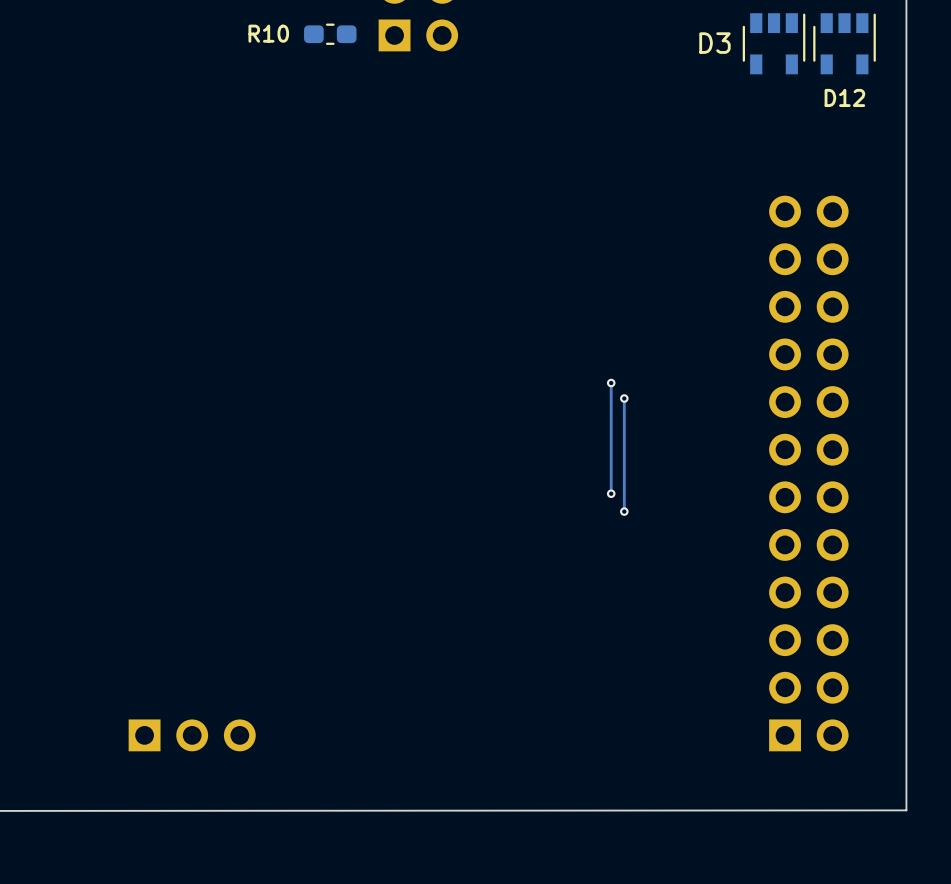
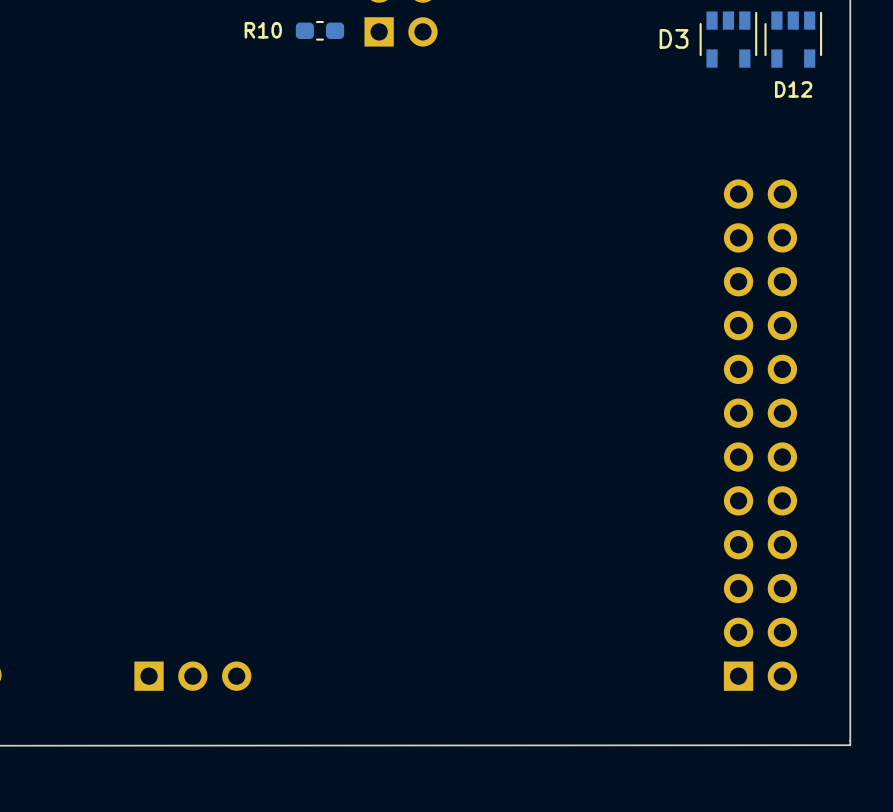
track: (611, 383) (611, 493) -> none
via: (611, 383) -> none
track: (624, 398) (624, 511) -> none
via: (624, 398) -> none
via: (611, 493) -> none
via: (624, 511) -> none

